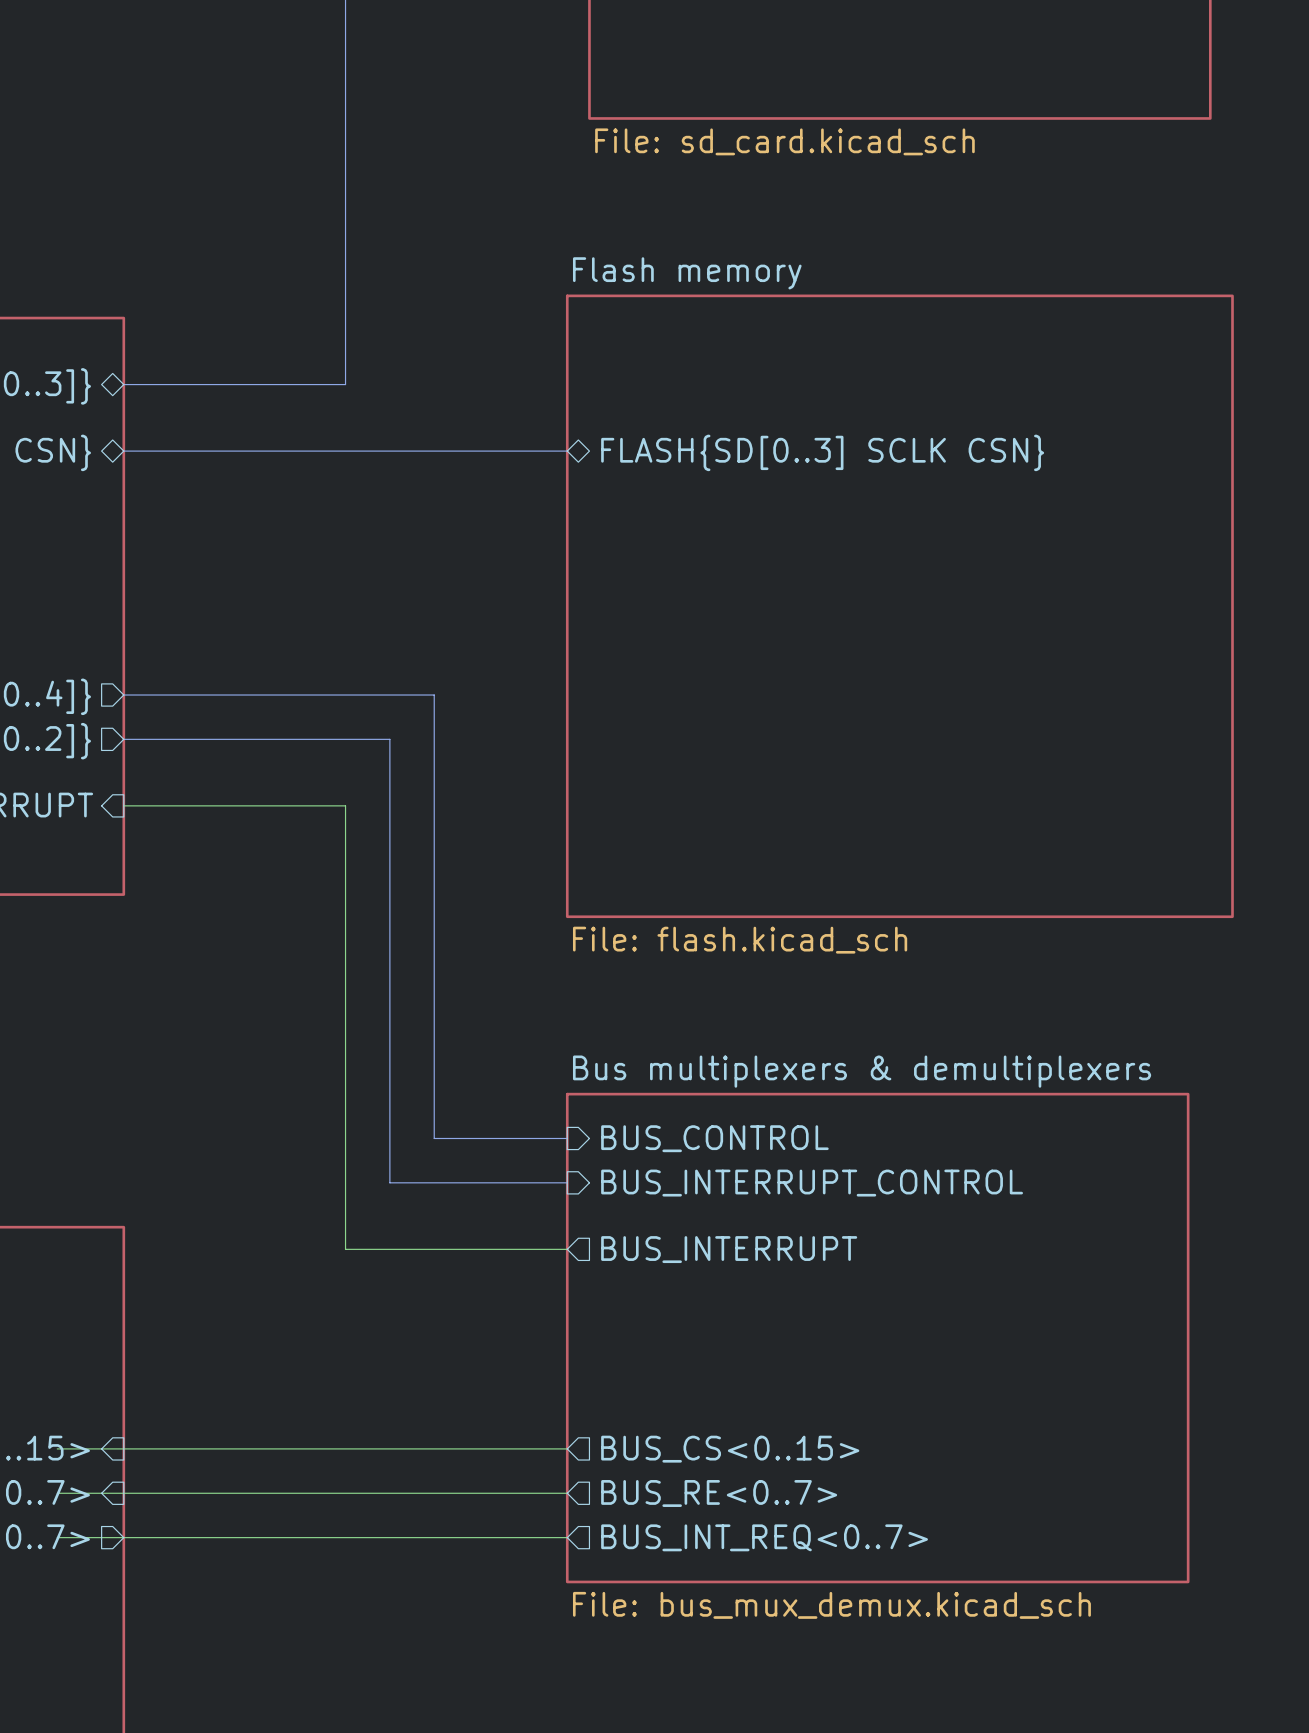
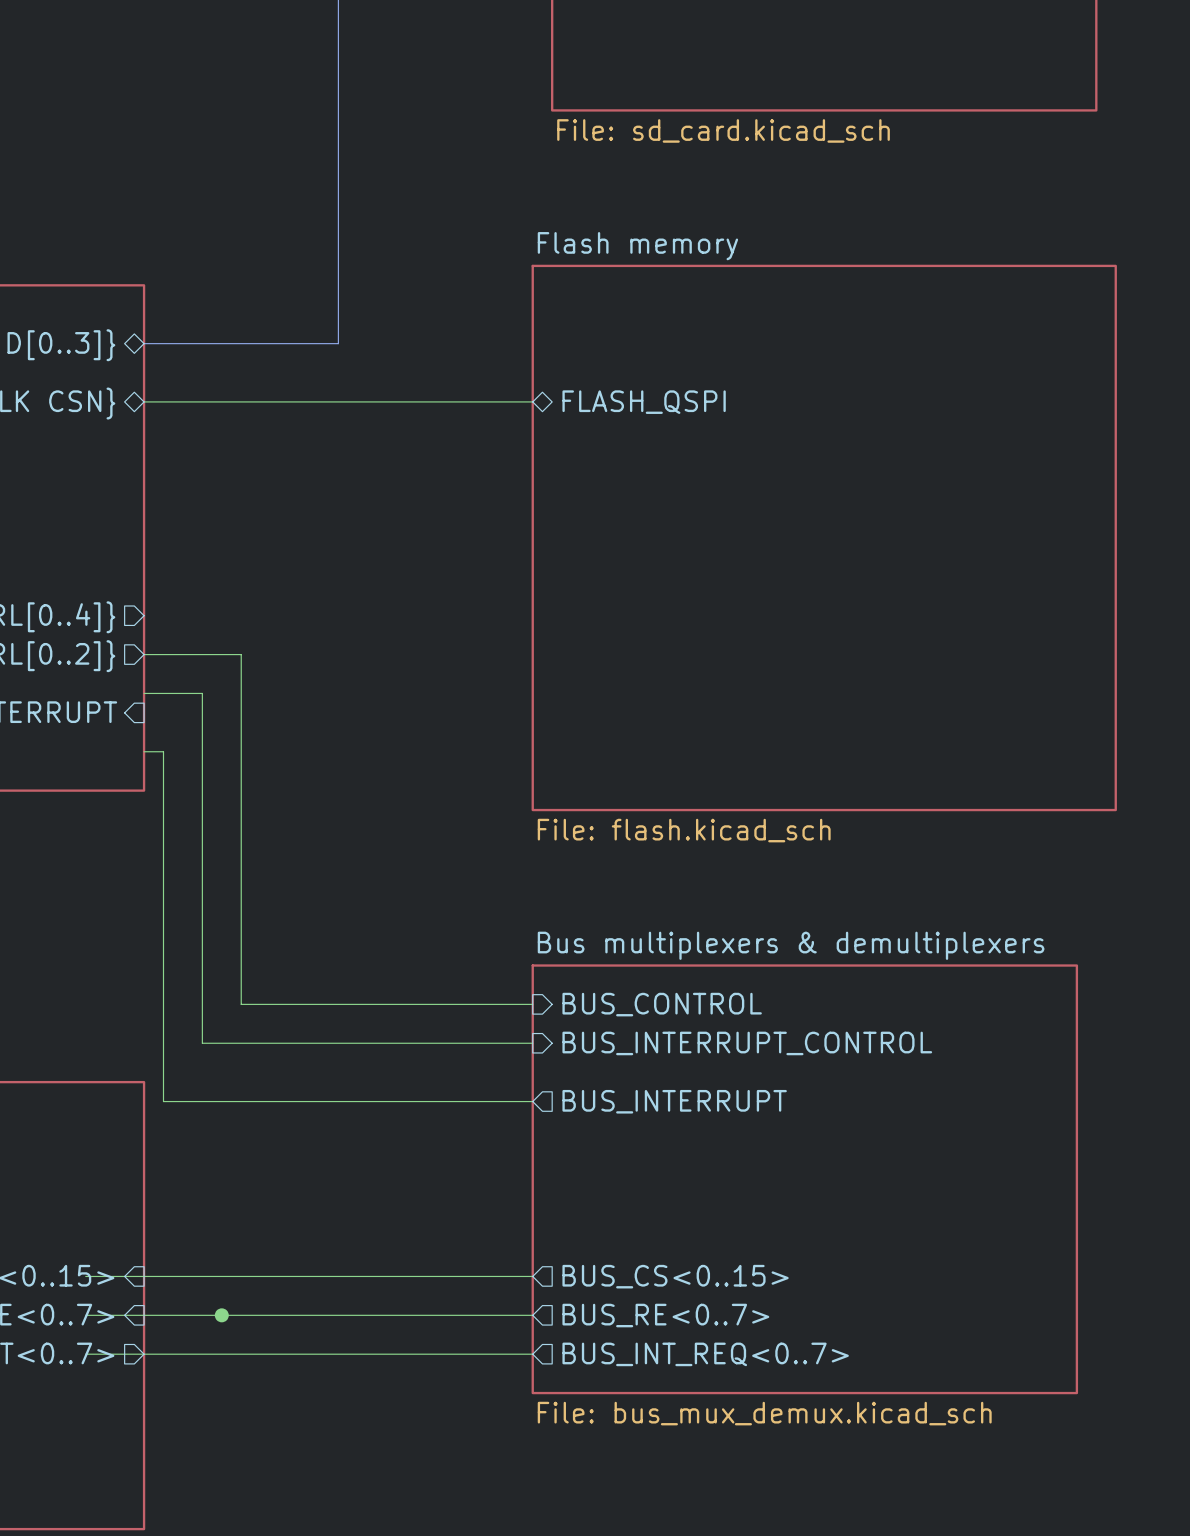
bus: (123, 451) (567, 451) -> none
sheet pin: FLASH{SD[0..3] SCLK CSN} (822, 452) -> FLASH_QSPI (644, 402)
bus: (123, 695) (434, 695) (434, 1138) (567, 1138) -> none
bus: (123, 739) (389, 739) (389, 1182) (567, 1182) -> none
wire: none -> (144, 654) (241, 654) (241, 1004) (532, 1004)
wire: none -> (144, 693) (202, 693) (202, 1043) (532, 1043)
wire: (123, 805) (345, 805) (345, 1249) -> (144, 751) (163, 751) (163, 1101) (338, 1101)
junction: none -> (221, 1315)

